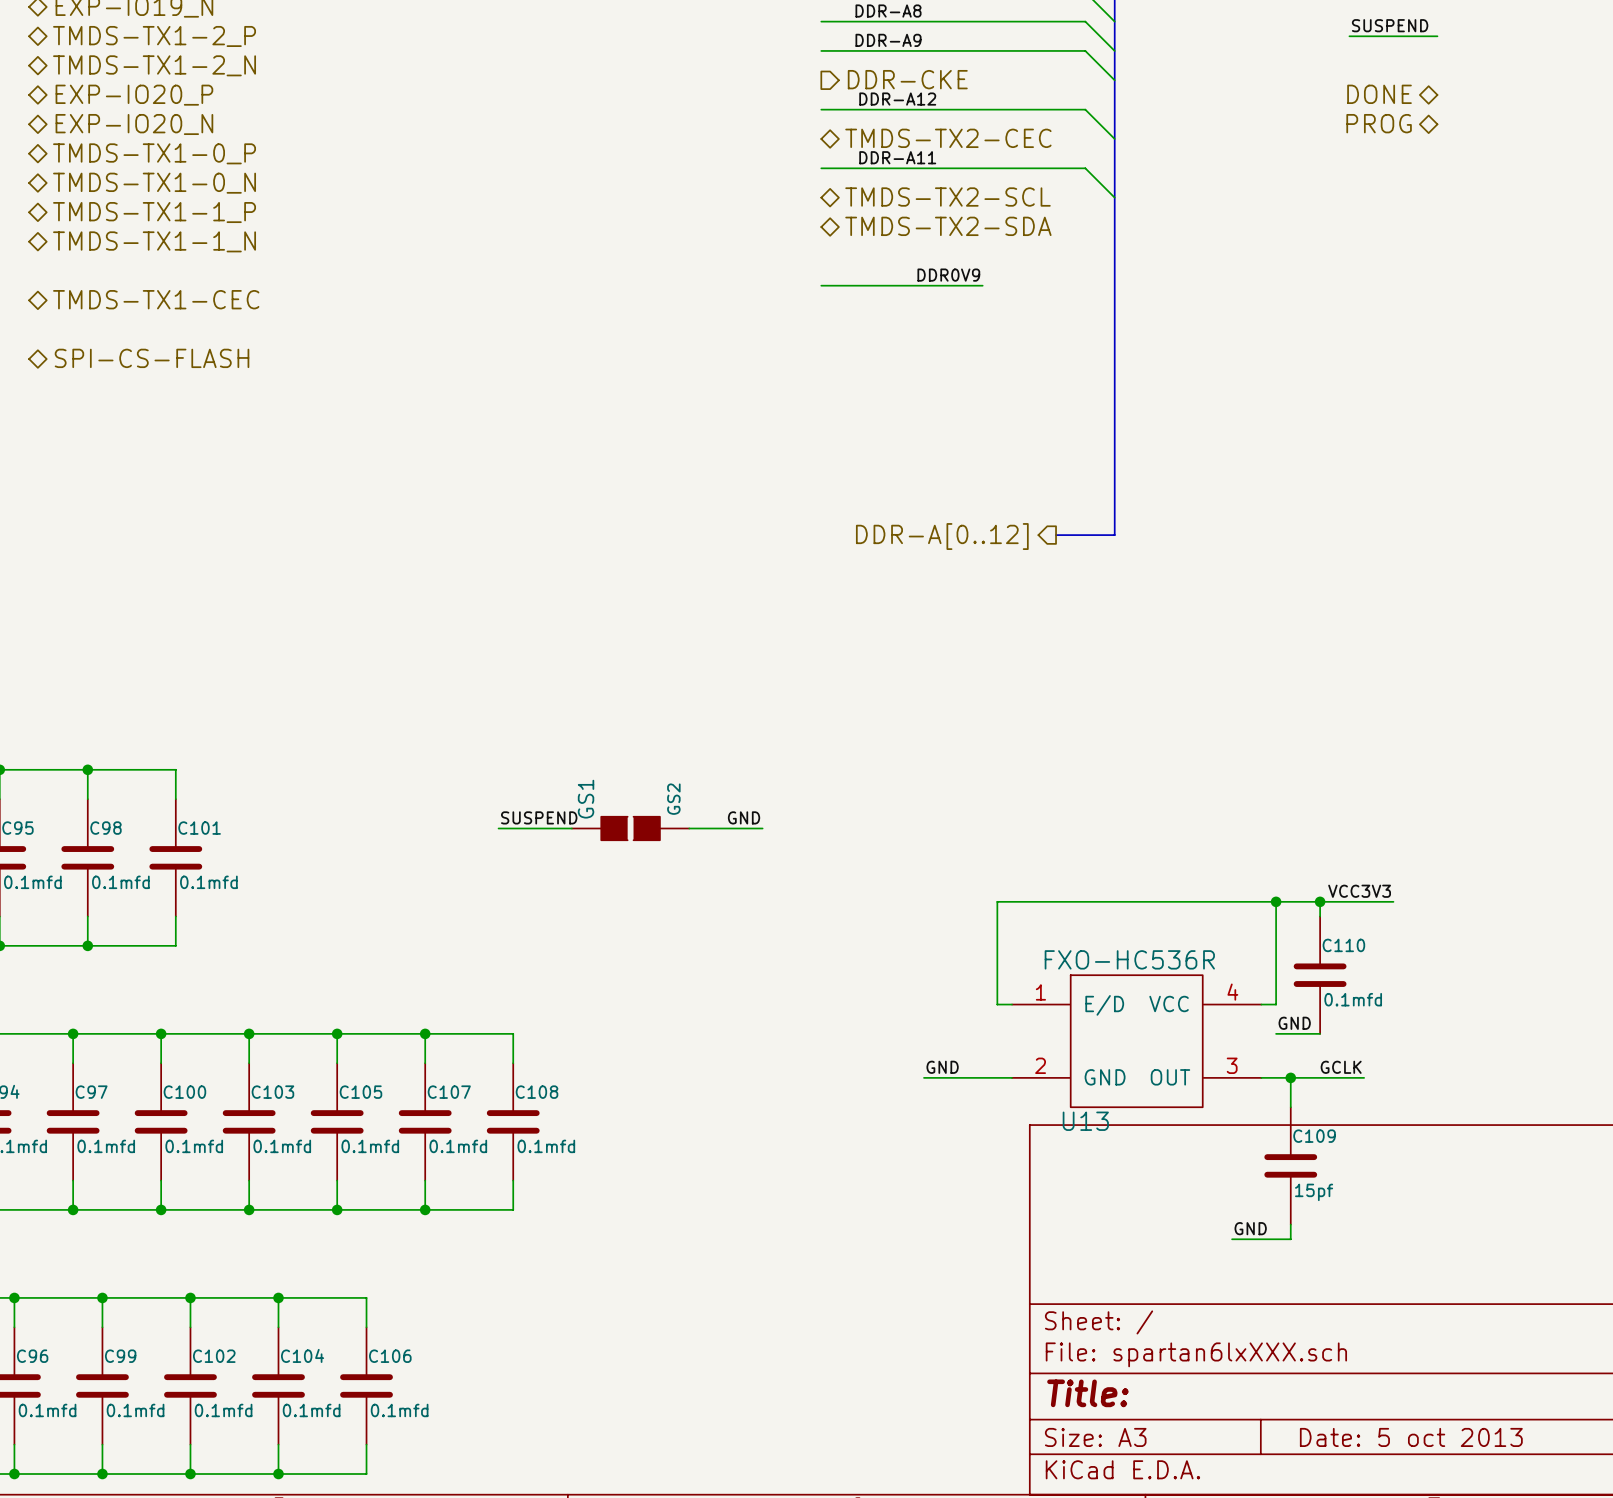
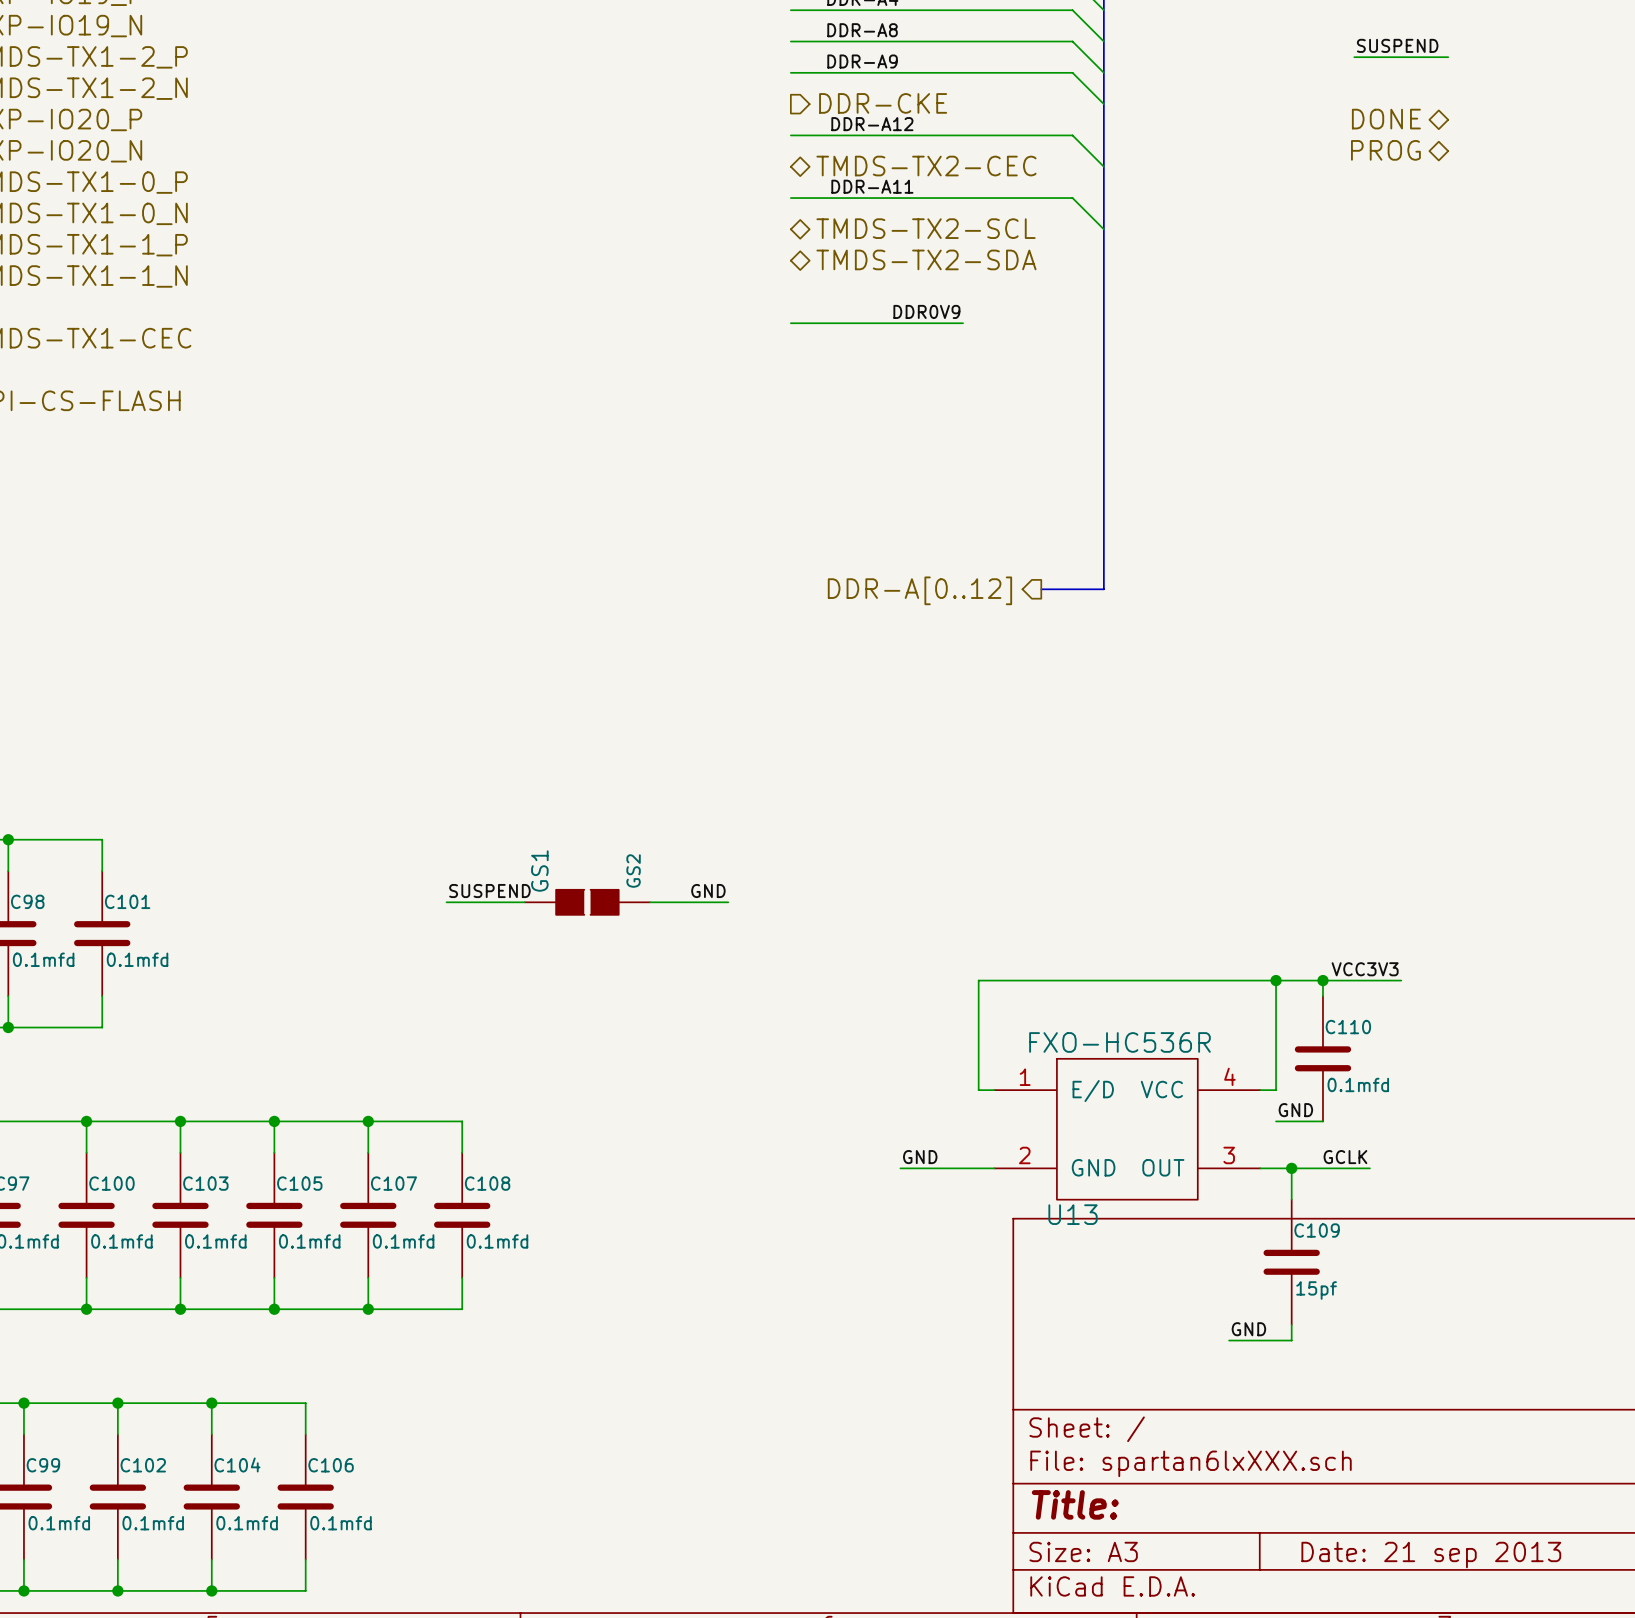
title block: Date: 5 oct 2013 (1411, 1437) -> Date: 21 sep 2013 (1431, 1555)

